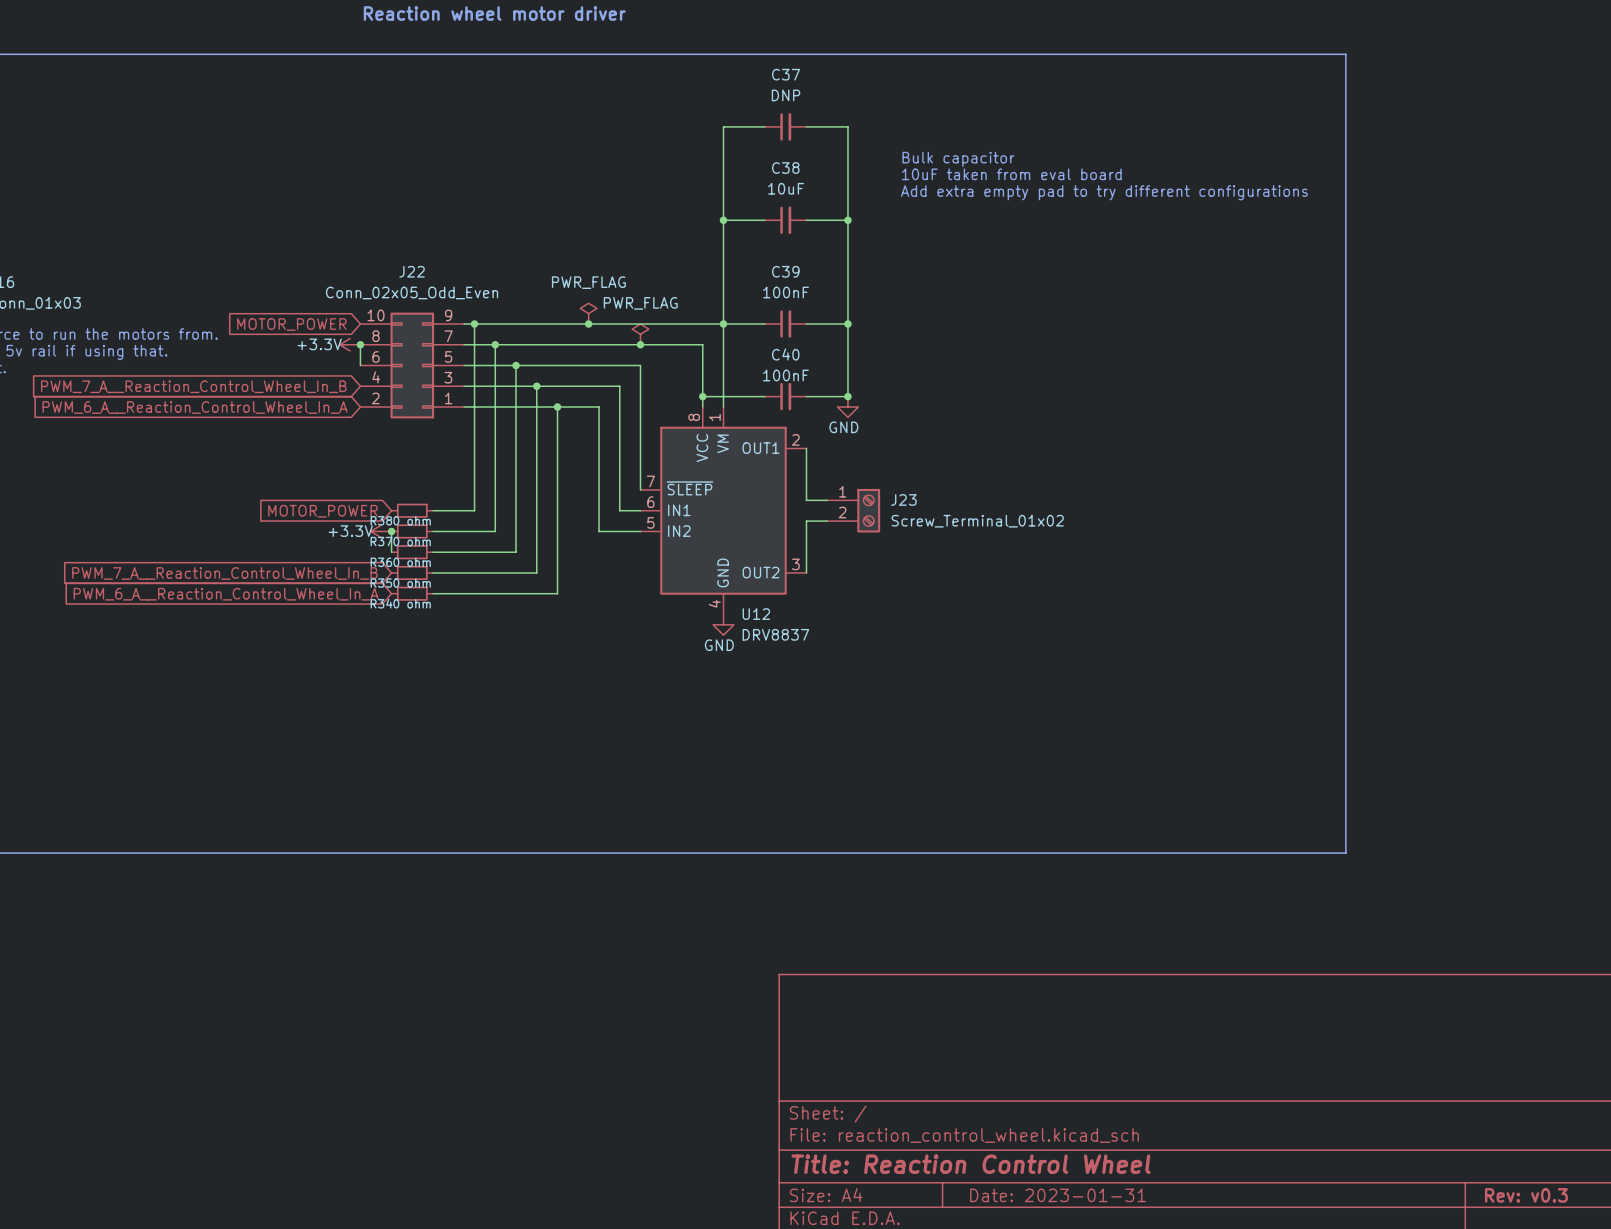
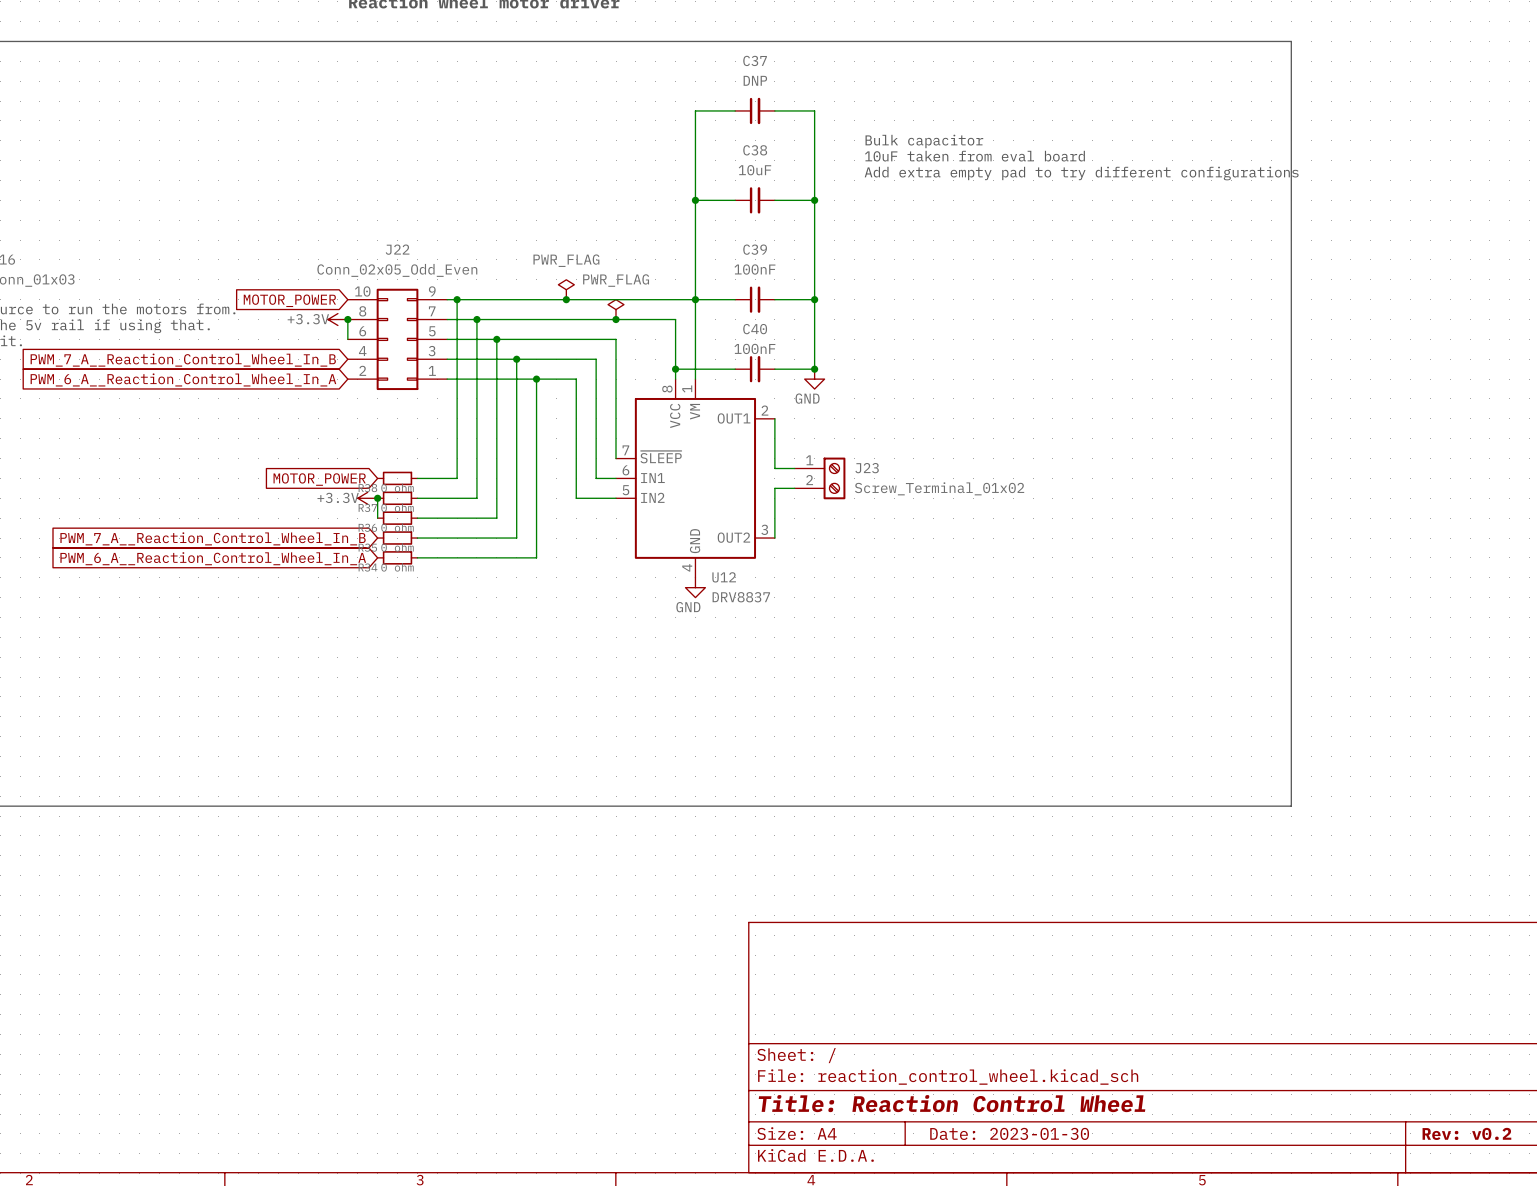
title block: Date: 2023-01-31 (1058, 1195) -> Date: 2023-01-30 (1009, 1133)
title block: Rev: v0.3 (1526, 1195) -> Rev: v0.2 (1466, 1133)

